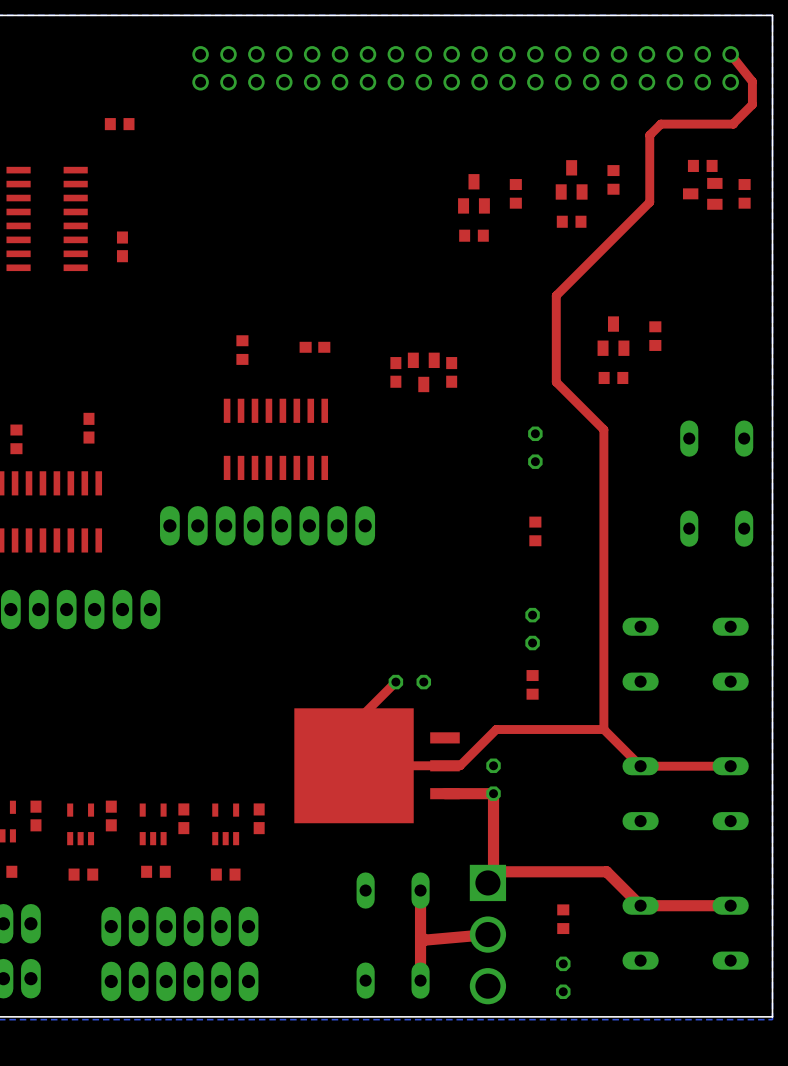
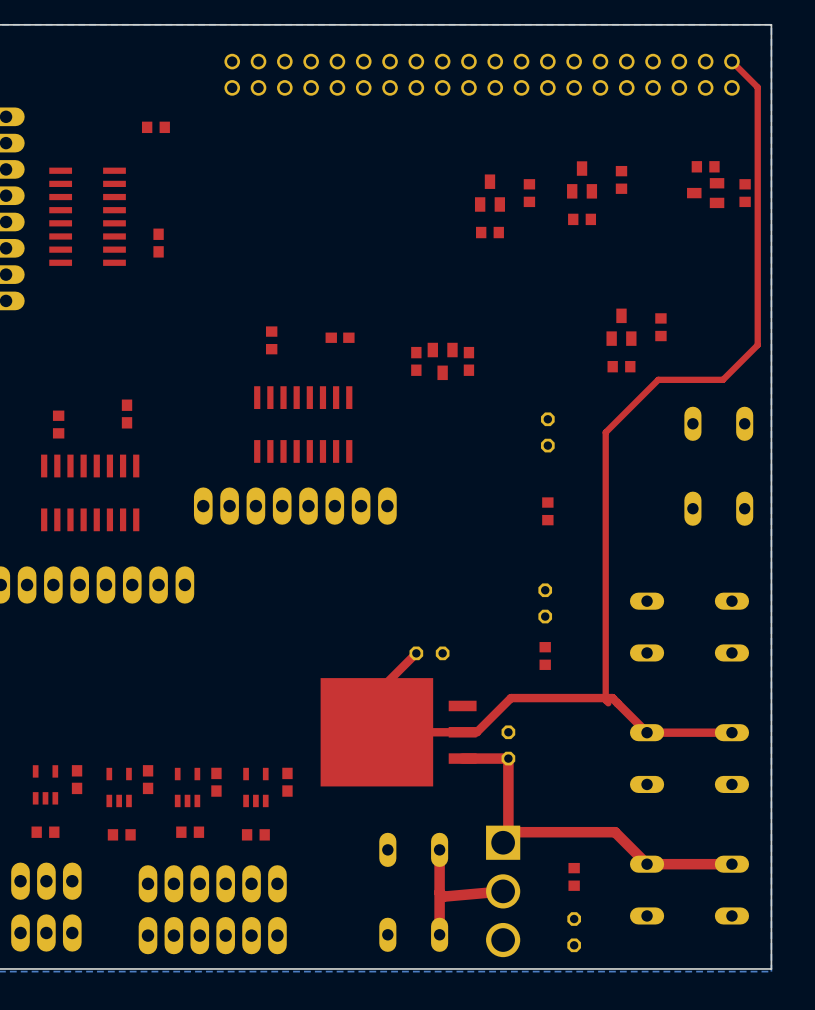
top track: (730, 54) (752, 81) (752, 104) (733, 124) (660, 124) (649, 135) (649, 202) (556, 295) (556, 382) (603, 429) (603, 729) -> (731, 61) (757, 87) (757, 345) (723, 379) (658, 379) (605, 432) (605, 700) (608, 703)

